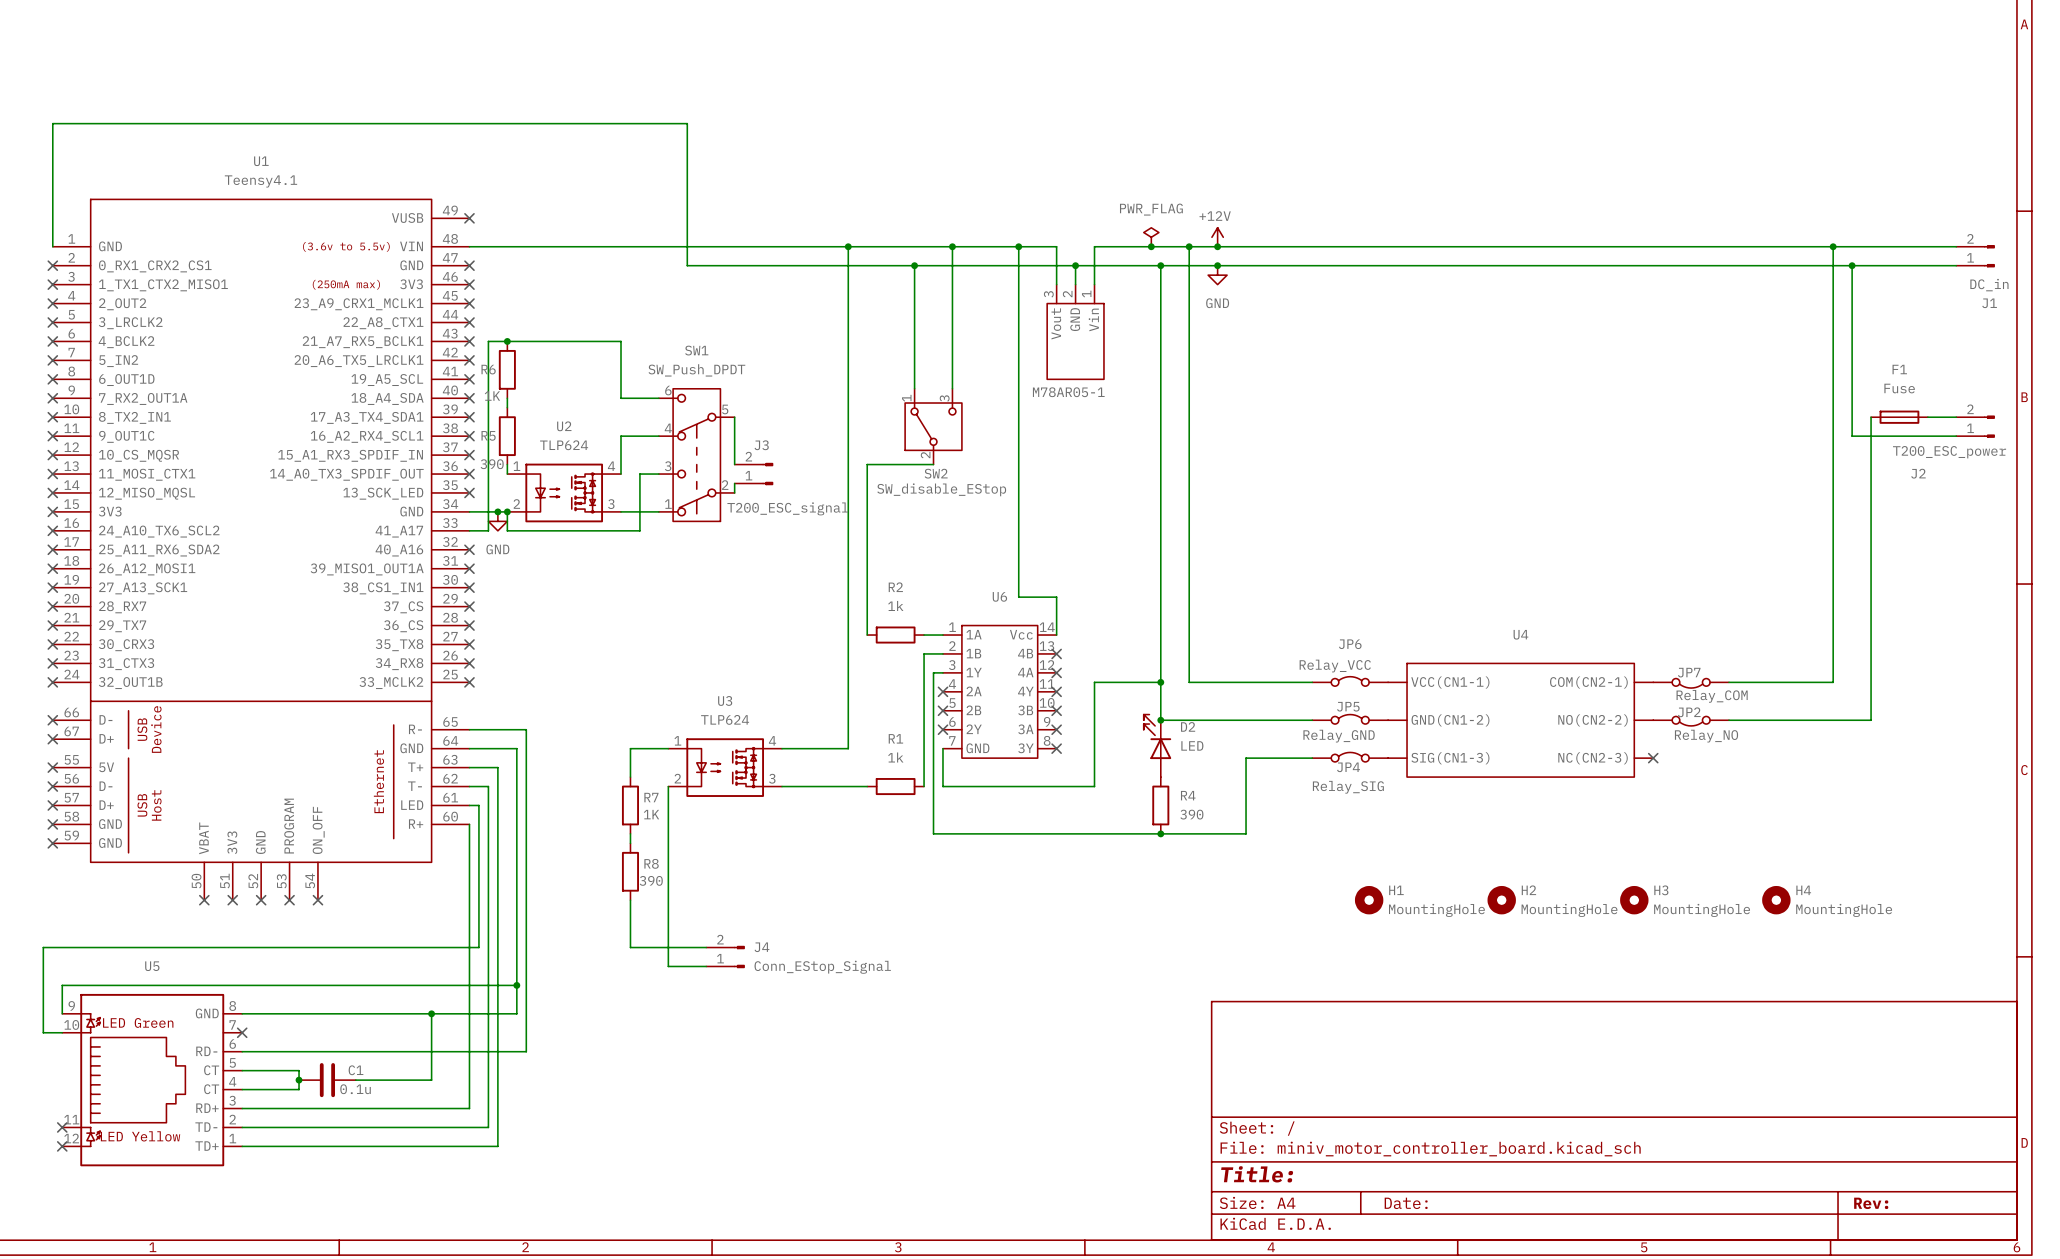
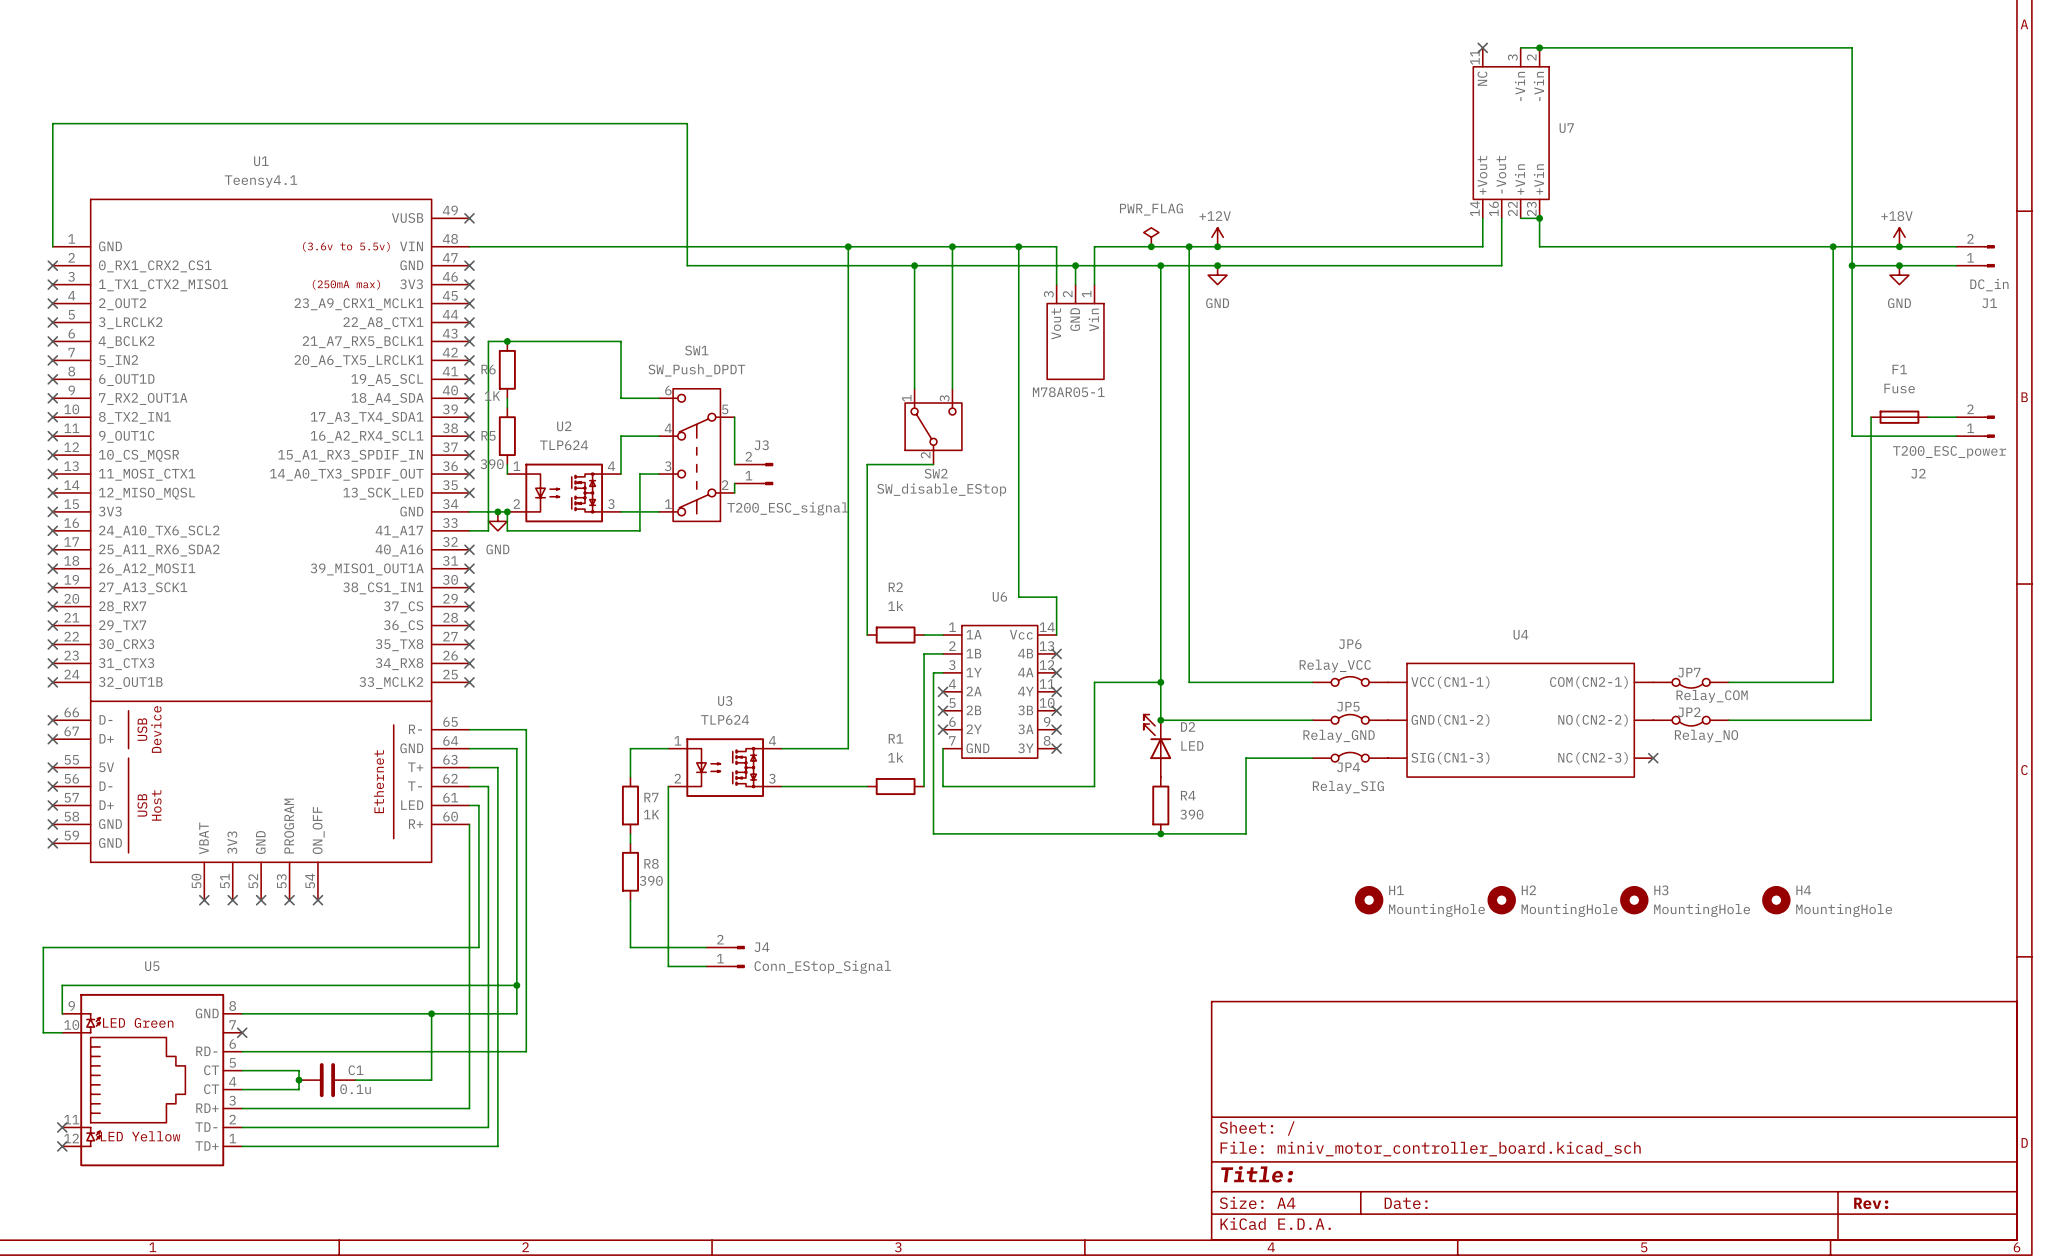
no-connect mark: none -> (1482, 47)
junction: none -> (1539, 47)
U7: none -> (1511, 133)
wire: none -> (1482, 218) (1482, 246)
wire: none -> (1501, 218) (1501, 265)
junction: none -> (1539, 218)
power symbol: none -> +18V (1899, 237)
wire: (1482, 246) (1539, 246) -> (1520, 218) (1539, 218) (1539, 246)
junction: none -> (1899, 246)
wire: (1501, 265) (1852, 265) -> (1520, 47) (1852, 47) (1852, 265)
junction: none -> (1899, 265)
power symbol: none -> GND (1899, 275)

